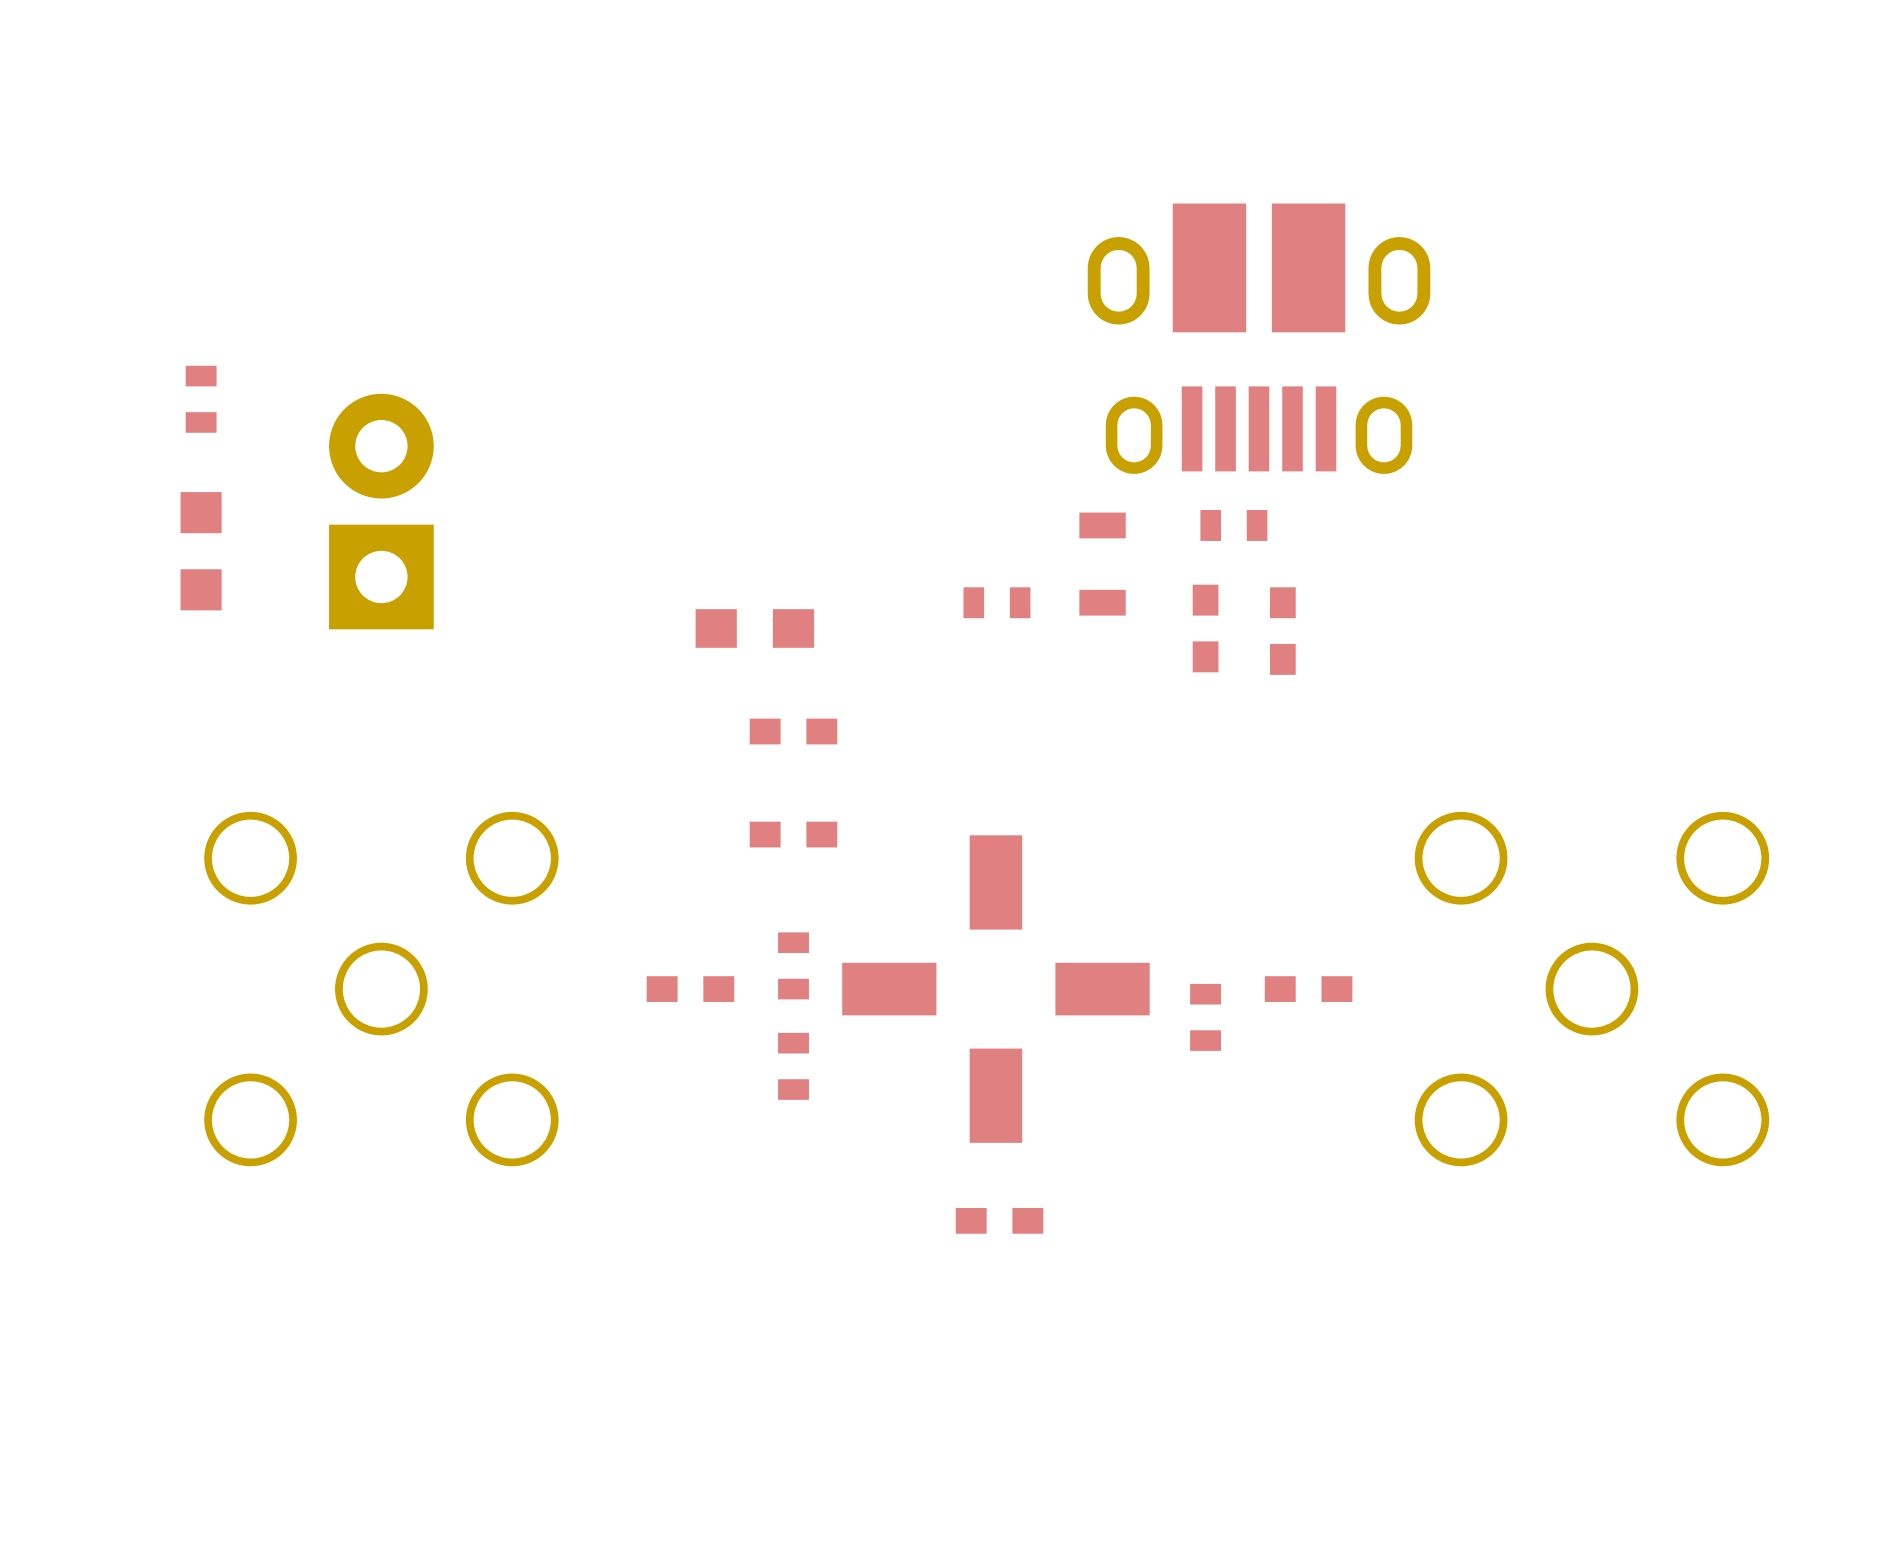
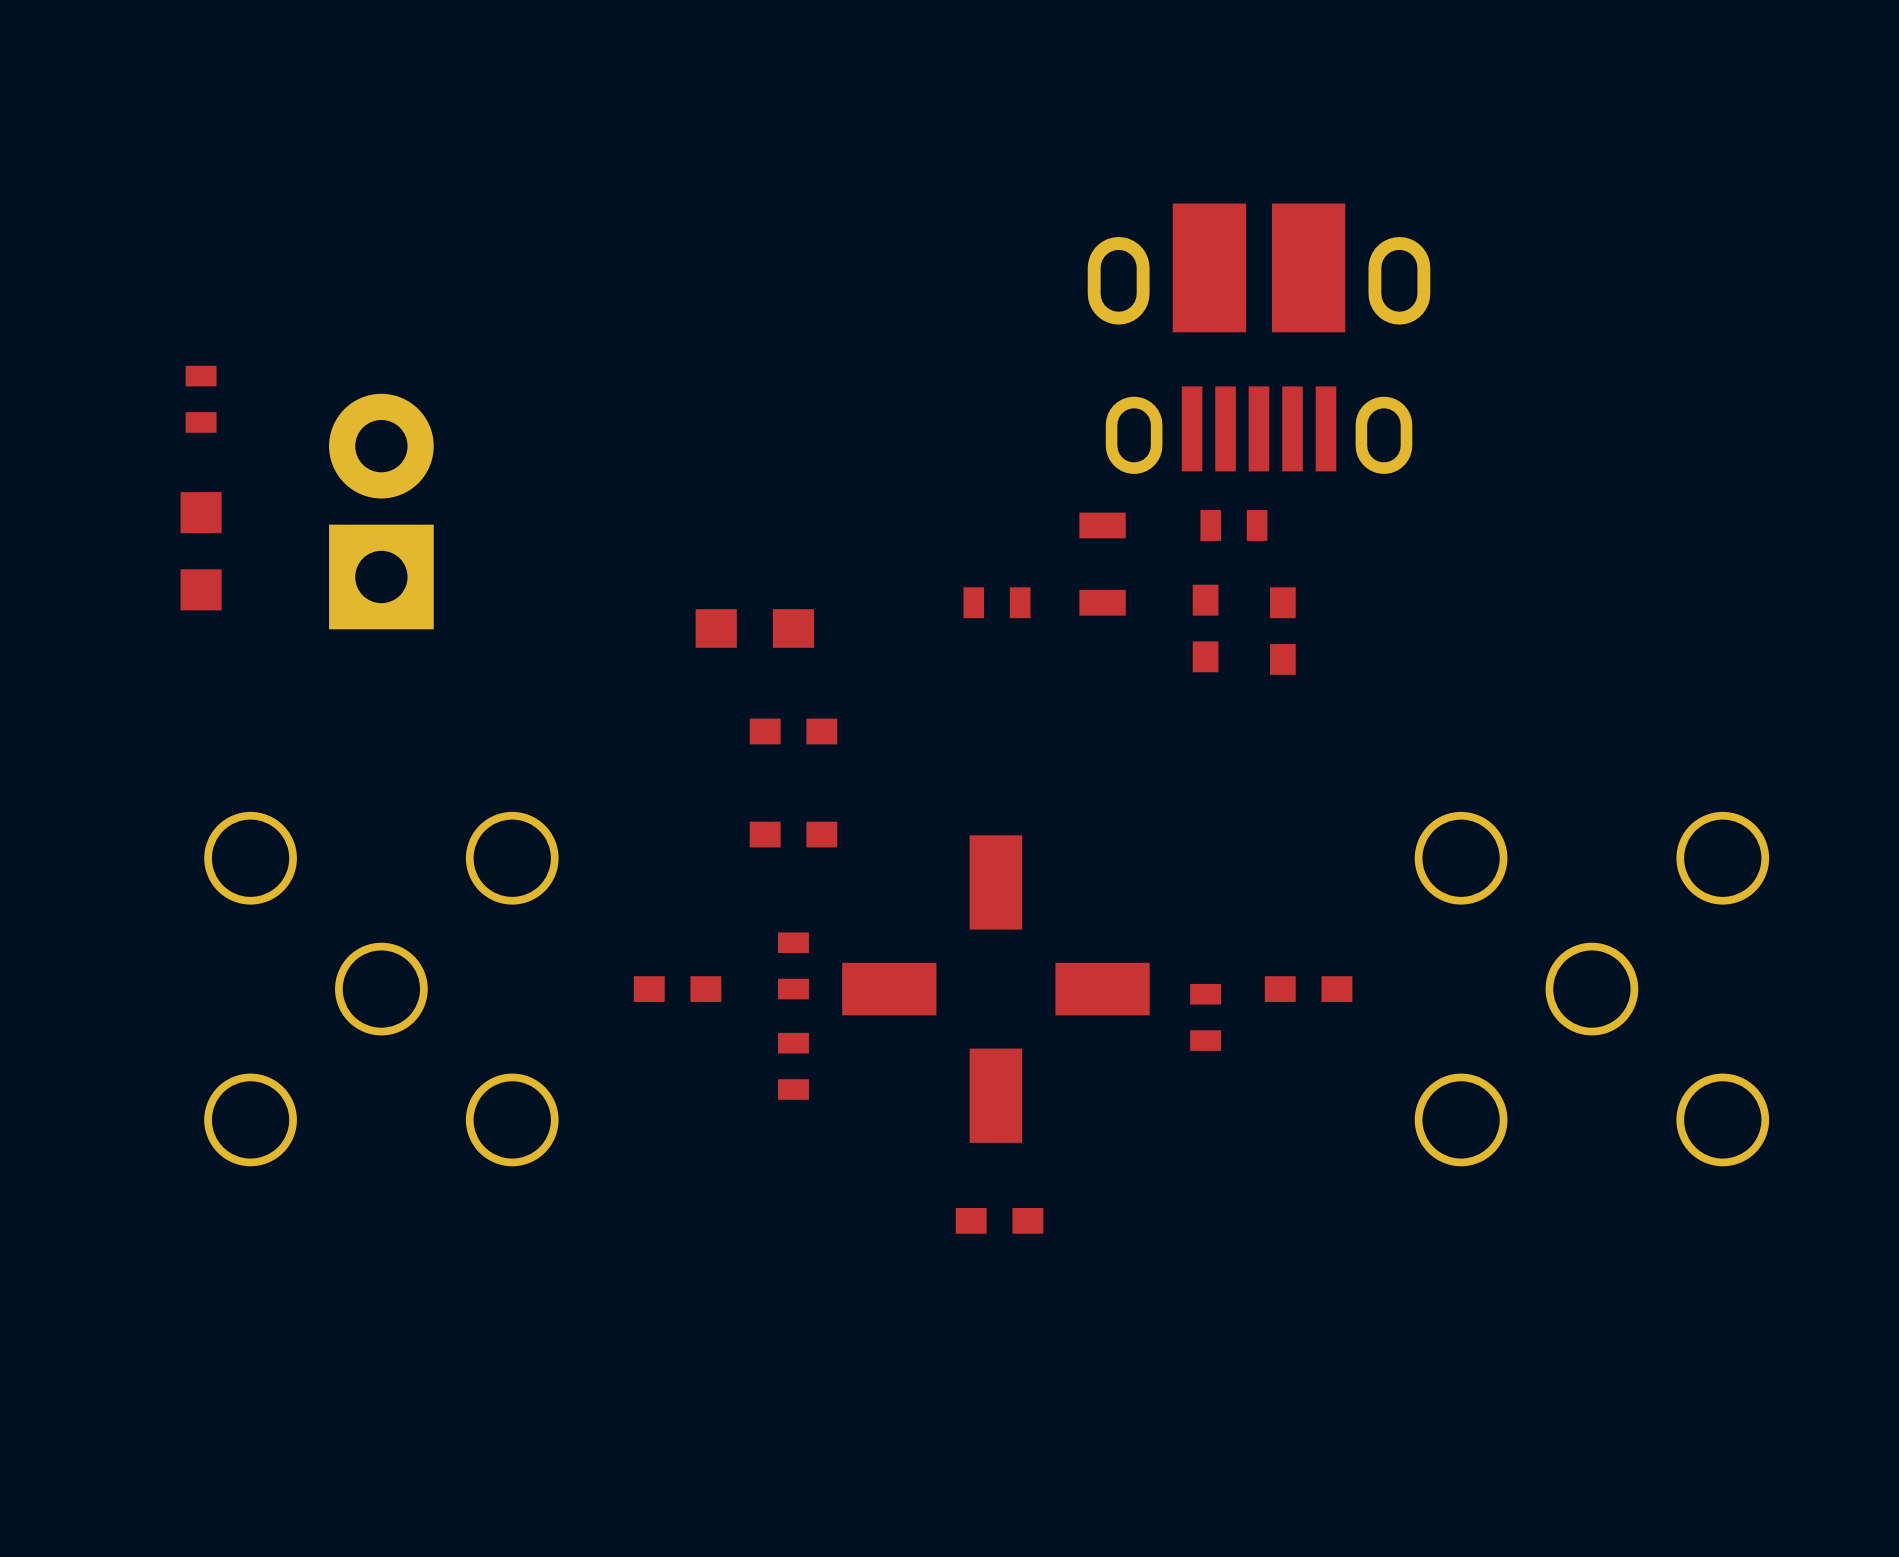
part position: (690, 989) -> (677, 989)

